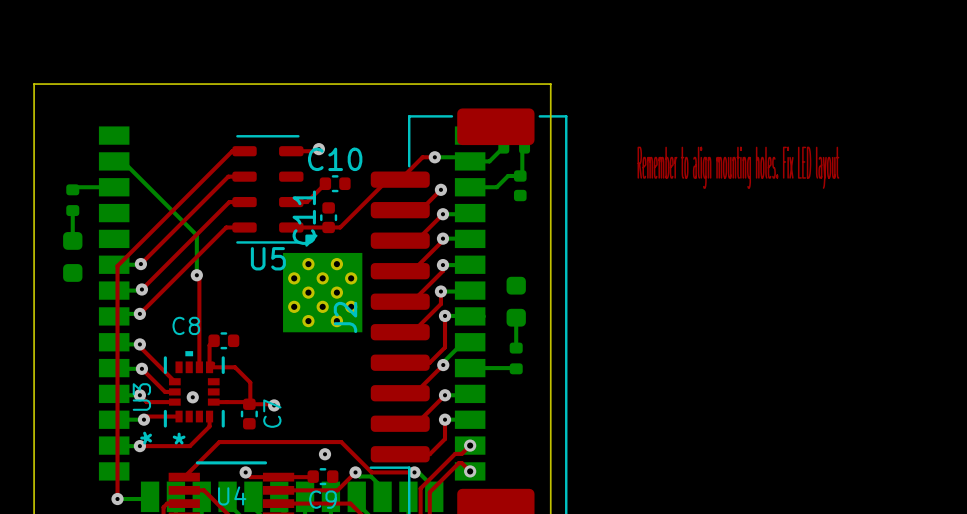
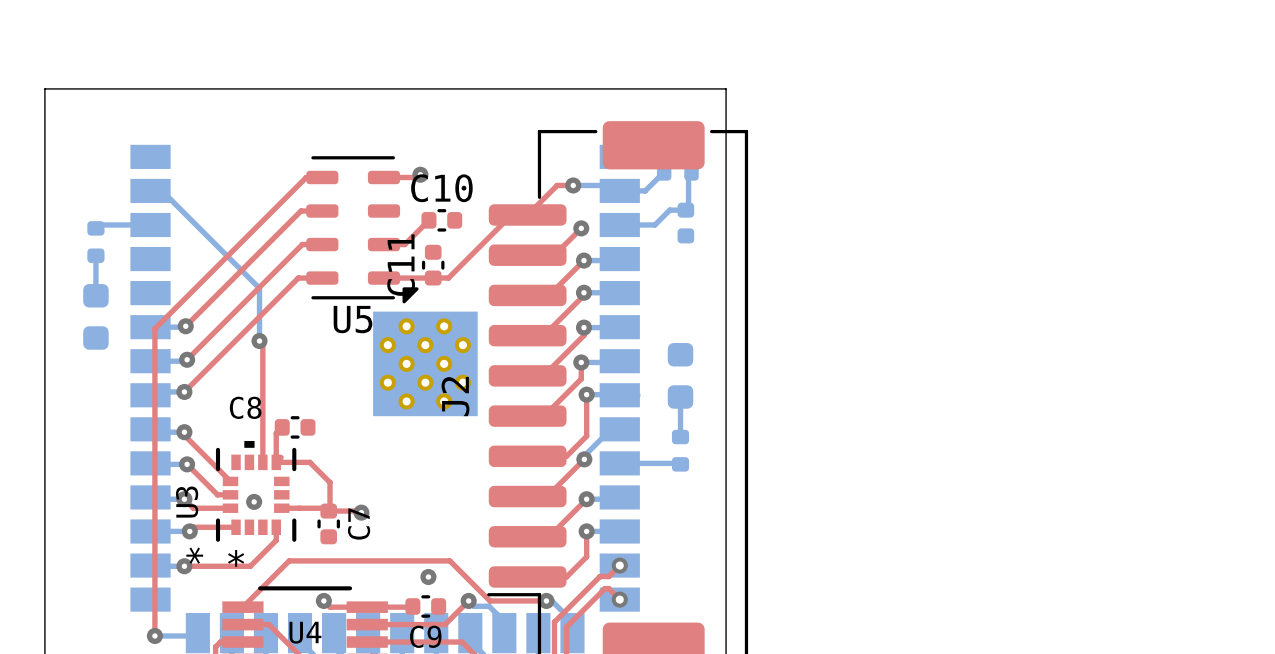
text: Remember to align mounting holes. Fix LED layout (738, 167) -> none

